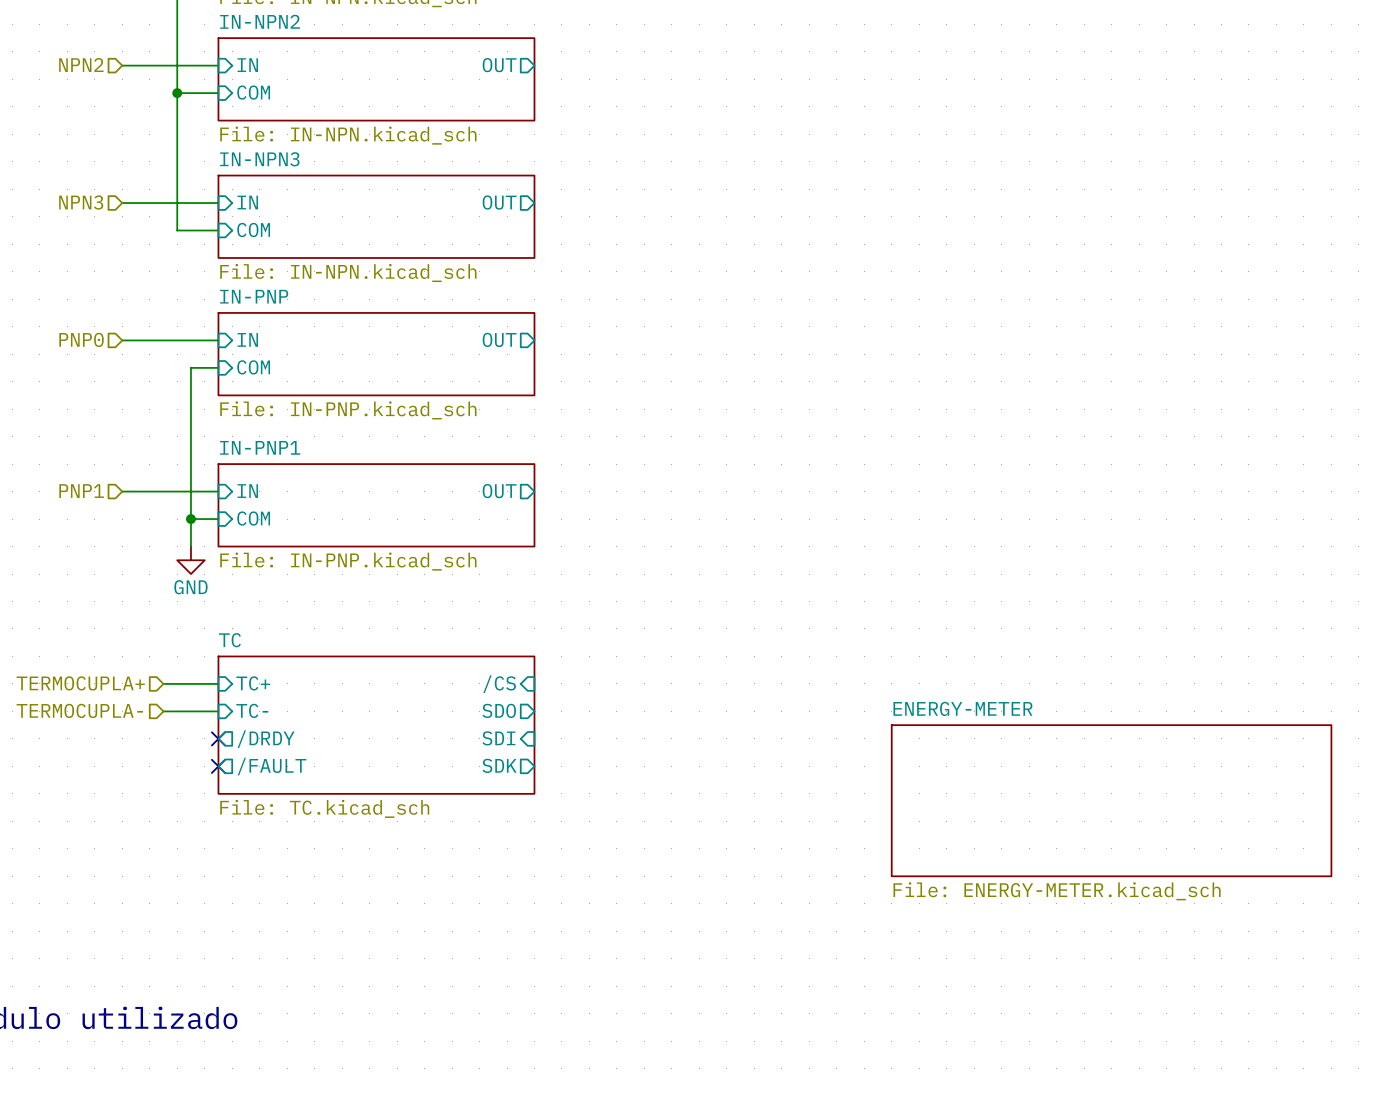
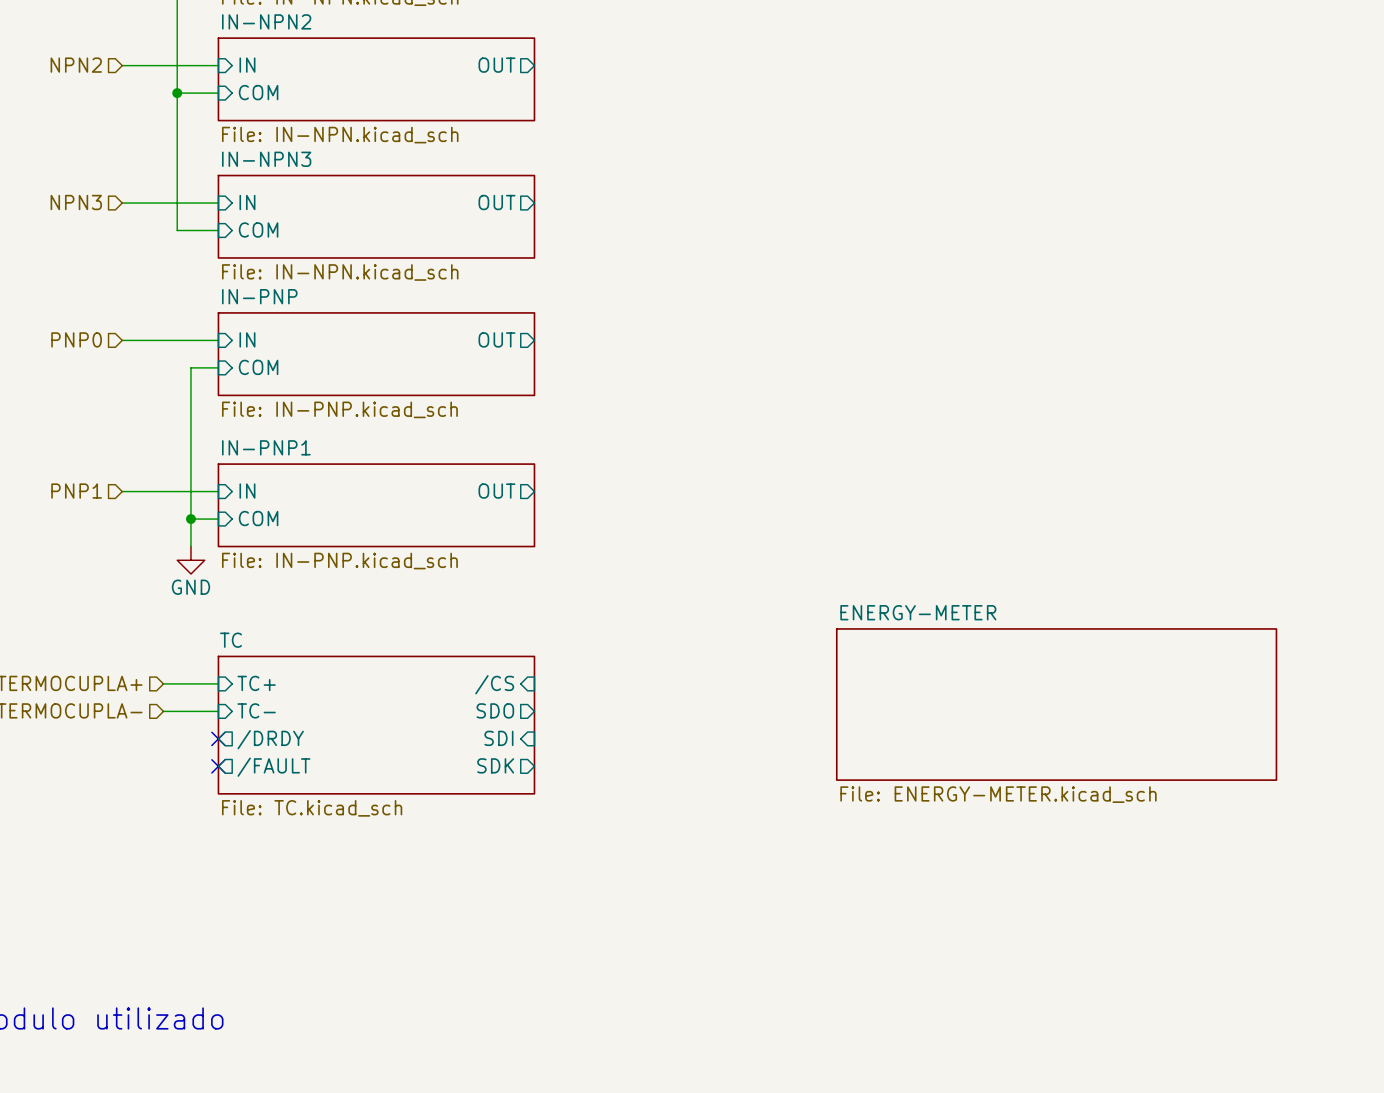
sheet ENERGY-METER position: (1111, 800) -> (1056, 704)

